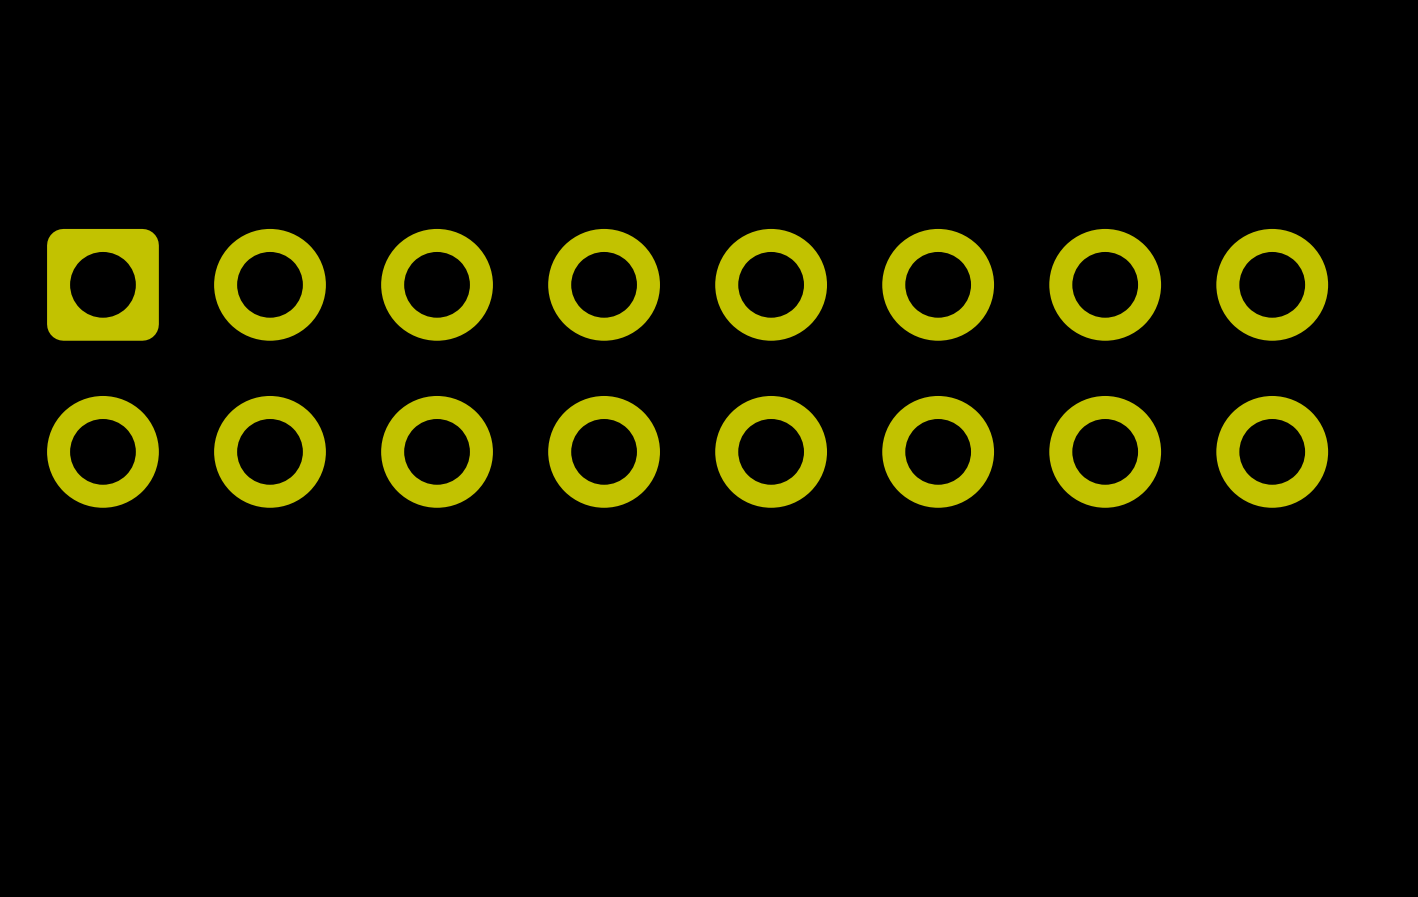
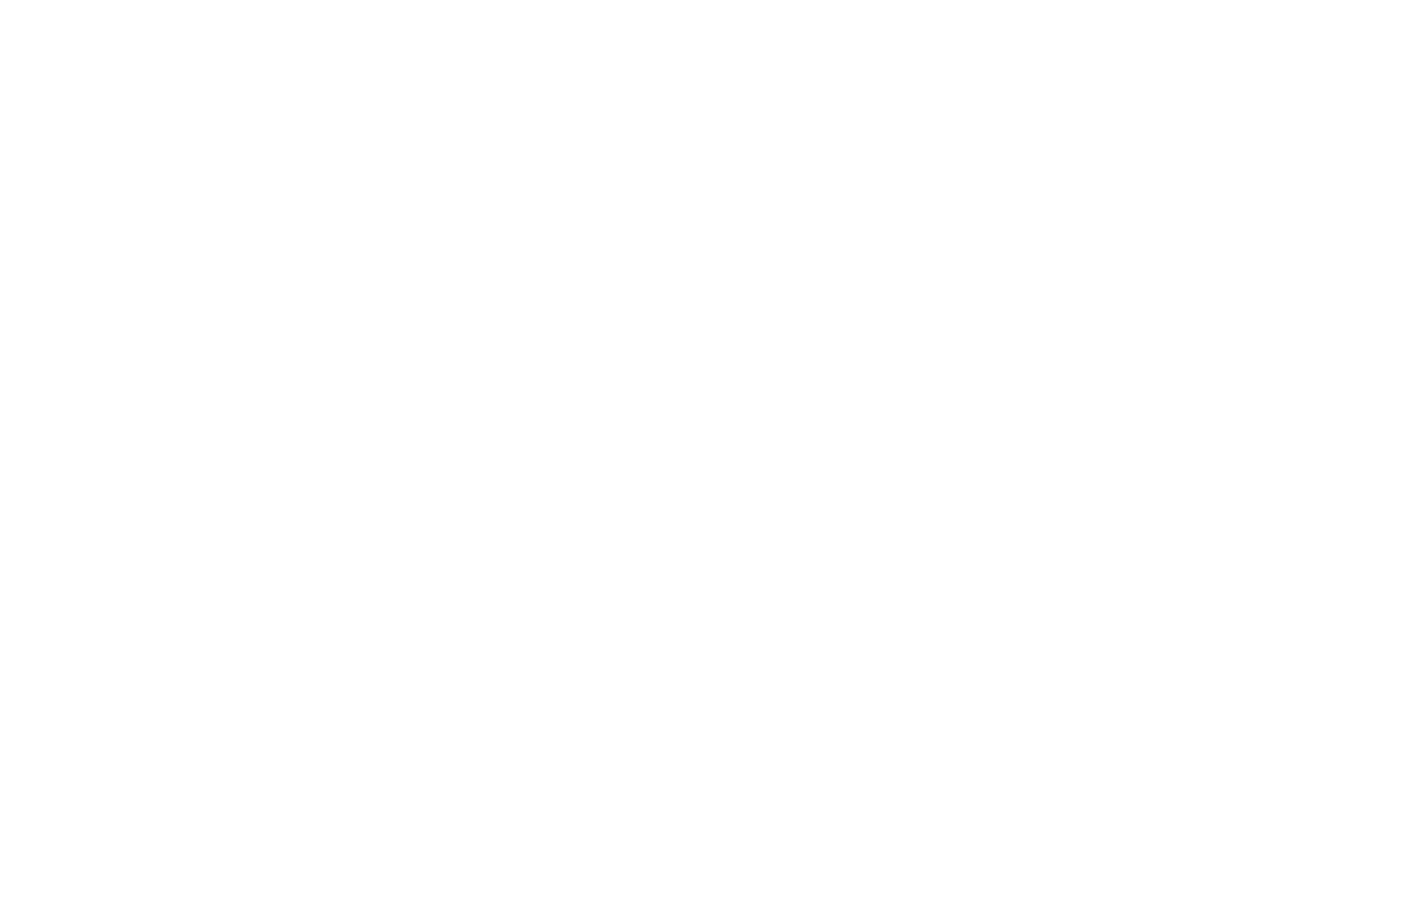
part: (687, 368) -> none

